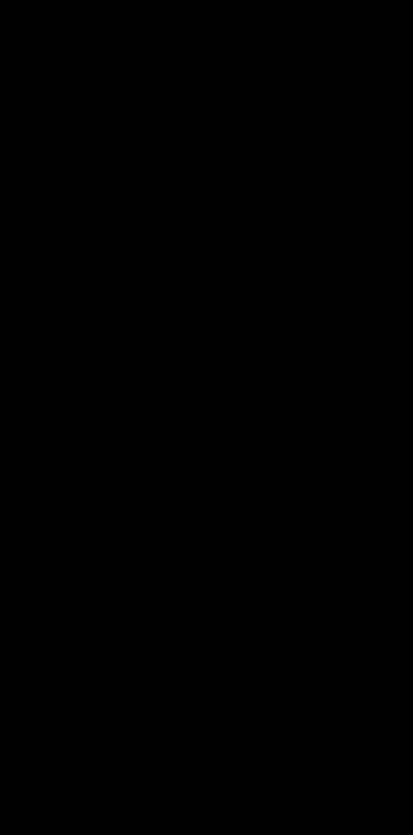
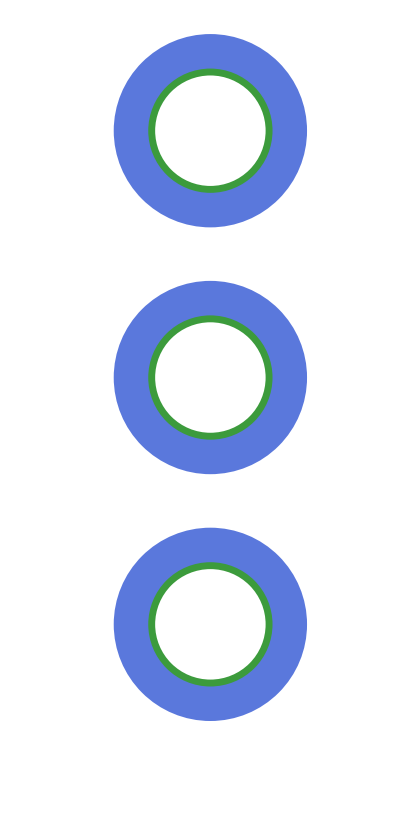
part: none -> (210, 130)
part: none -> (210, 377)
part: none -> (210, 624)

